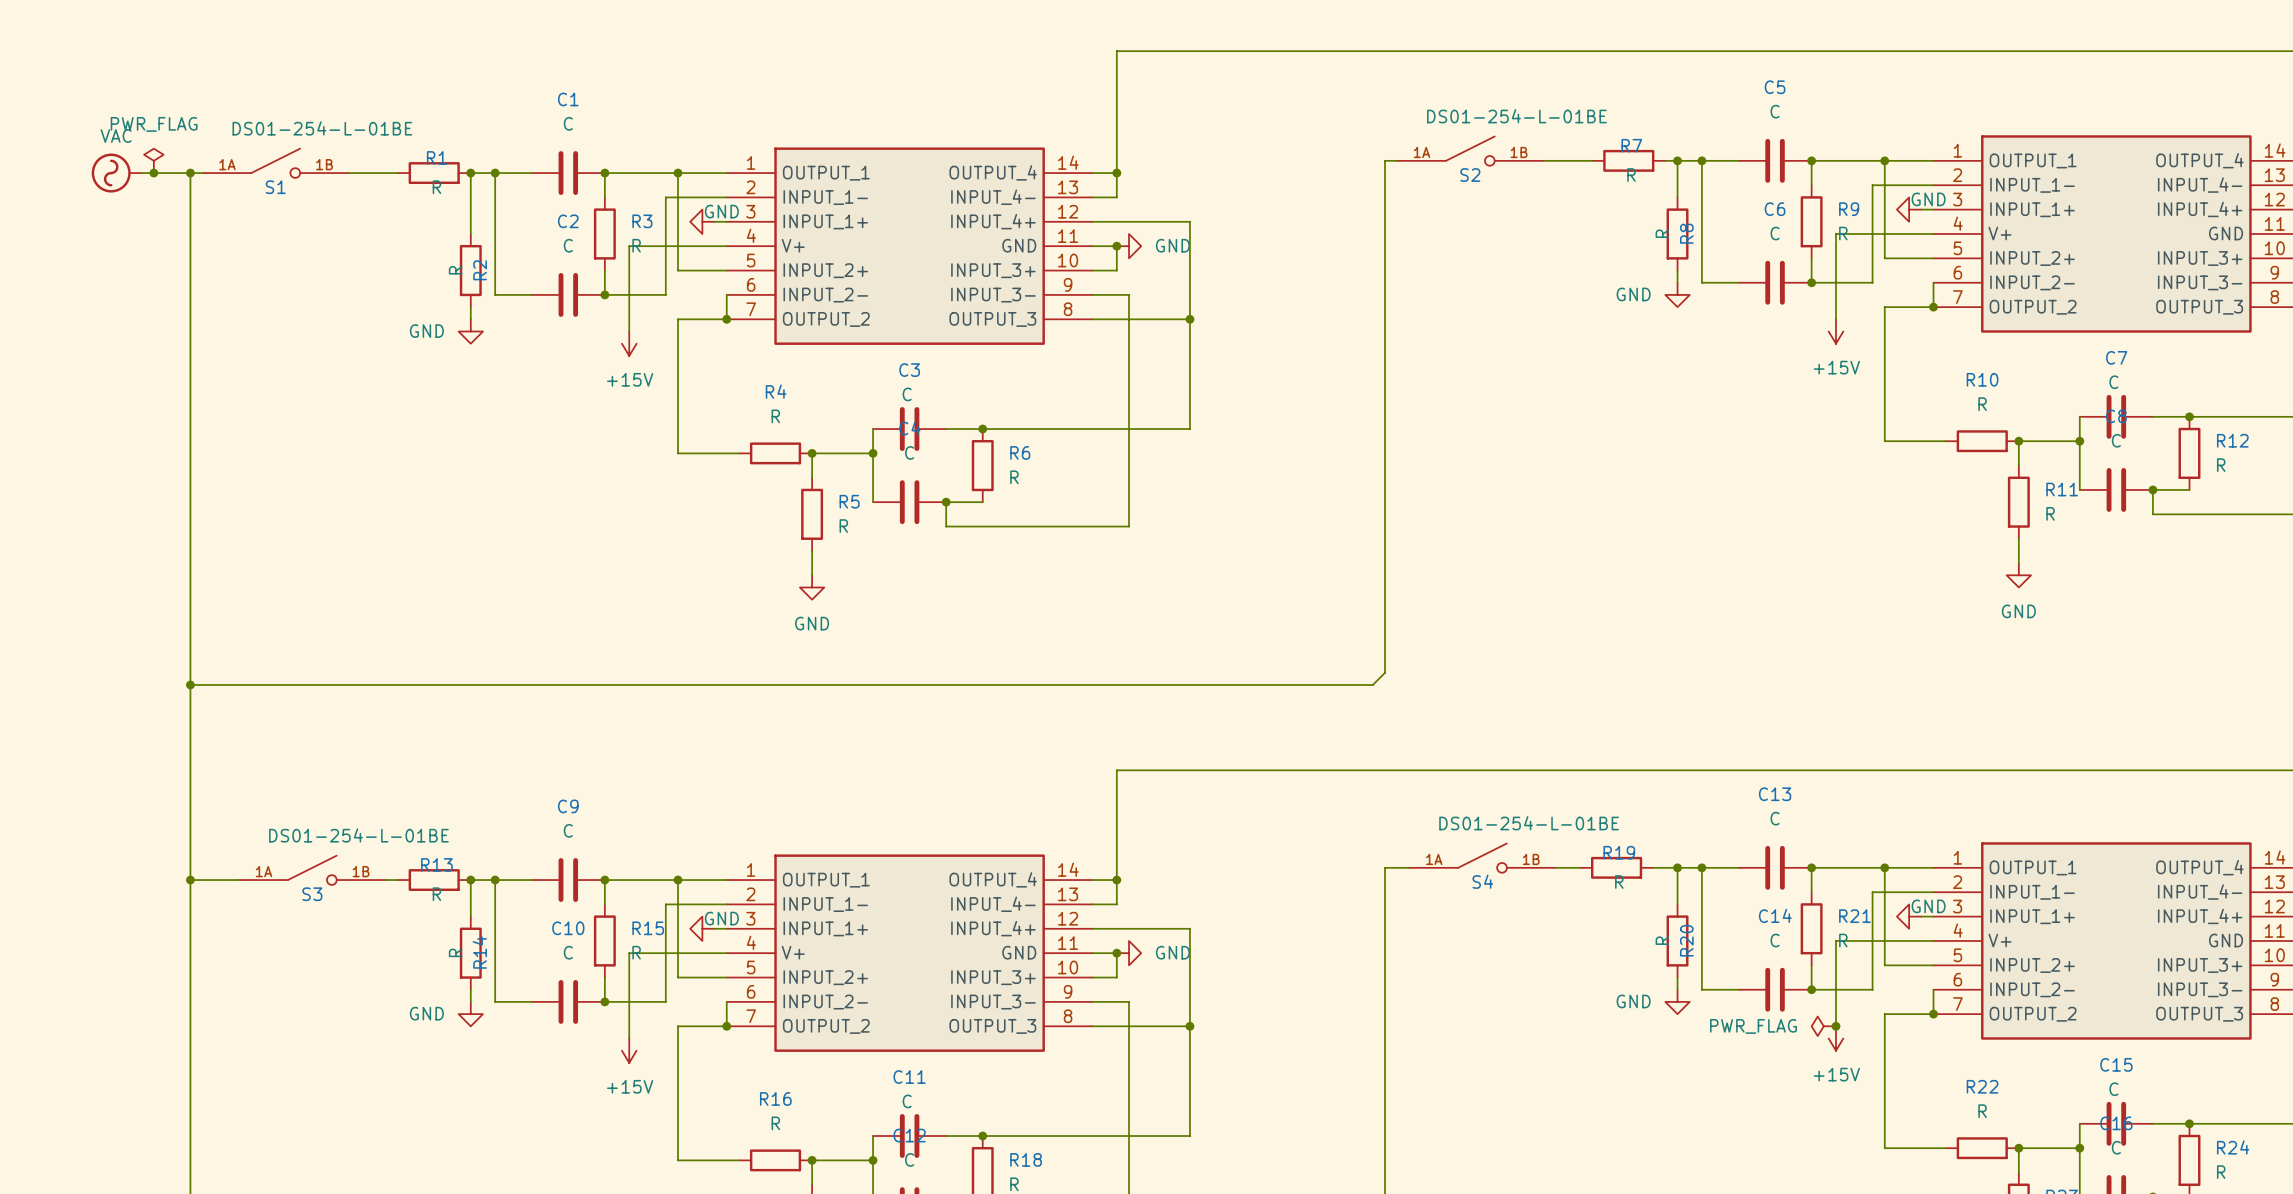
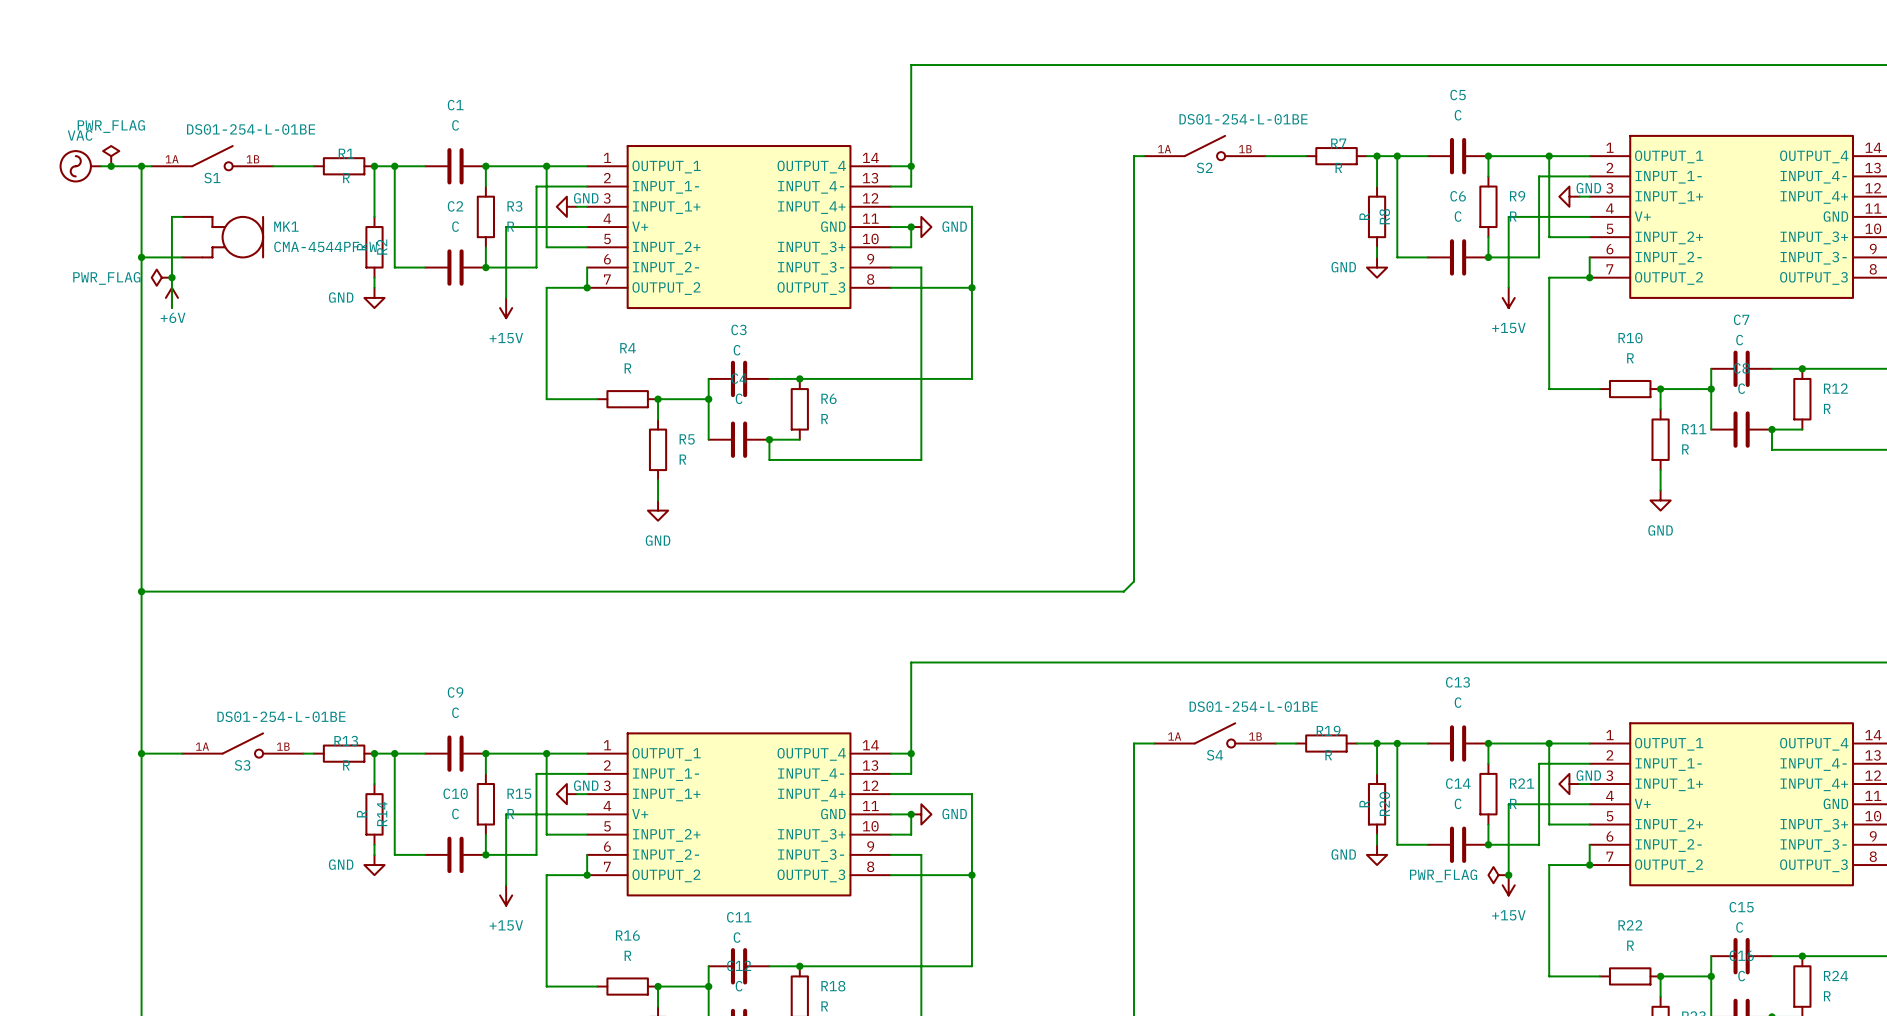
wire: none -> (182, 216) (171, 216) (171, 308)
MK1: none -> CMA-4544PF-W (223, 237)
wire: none -> (141, 257) (182, 257)
junction: none -> (141, 257)
power symbol: none -> PWR_FLAG (161, 277)
junction: none -> (171, 277)
power symbol: none -> +6V (171, 297)

